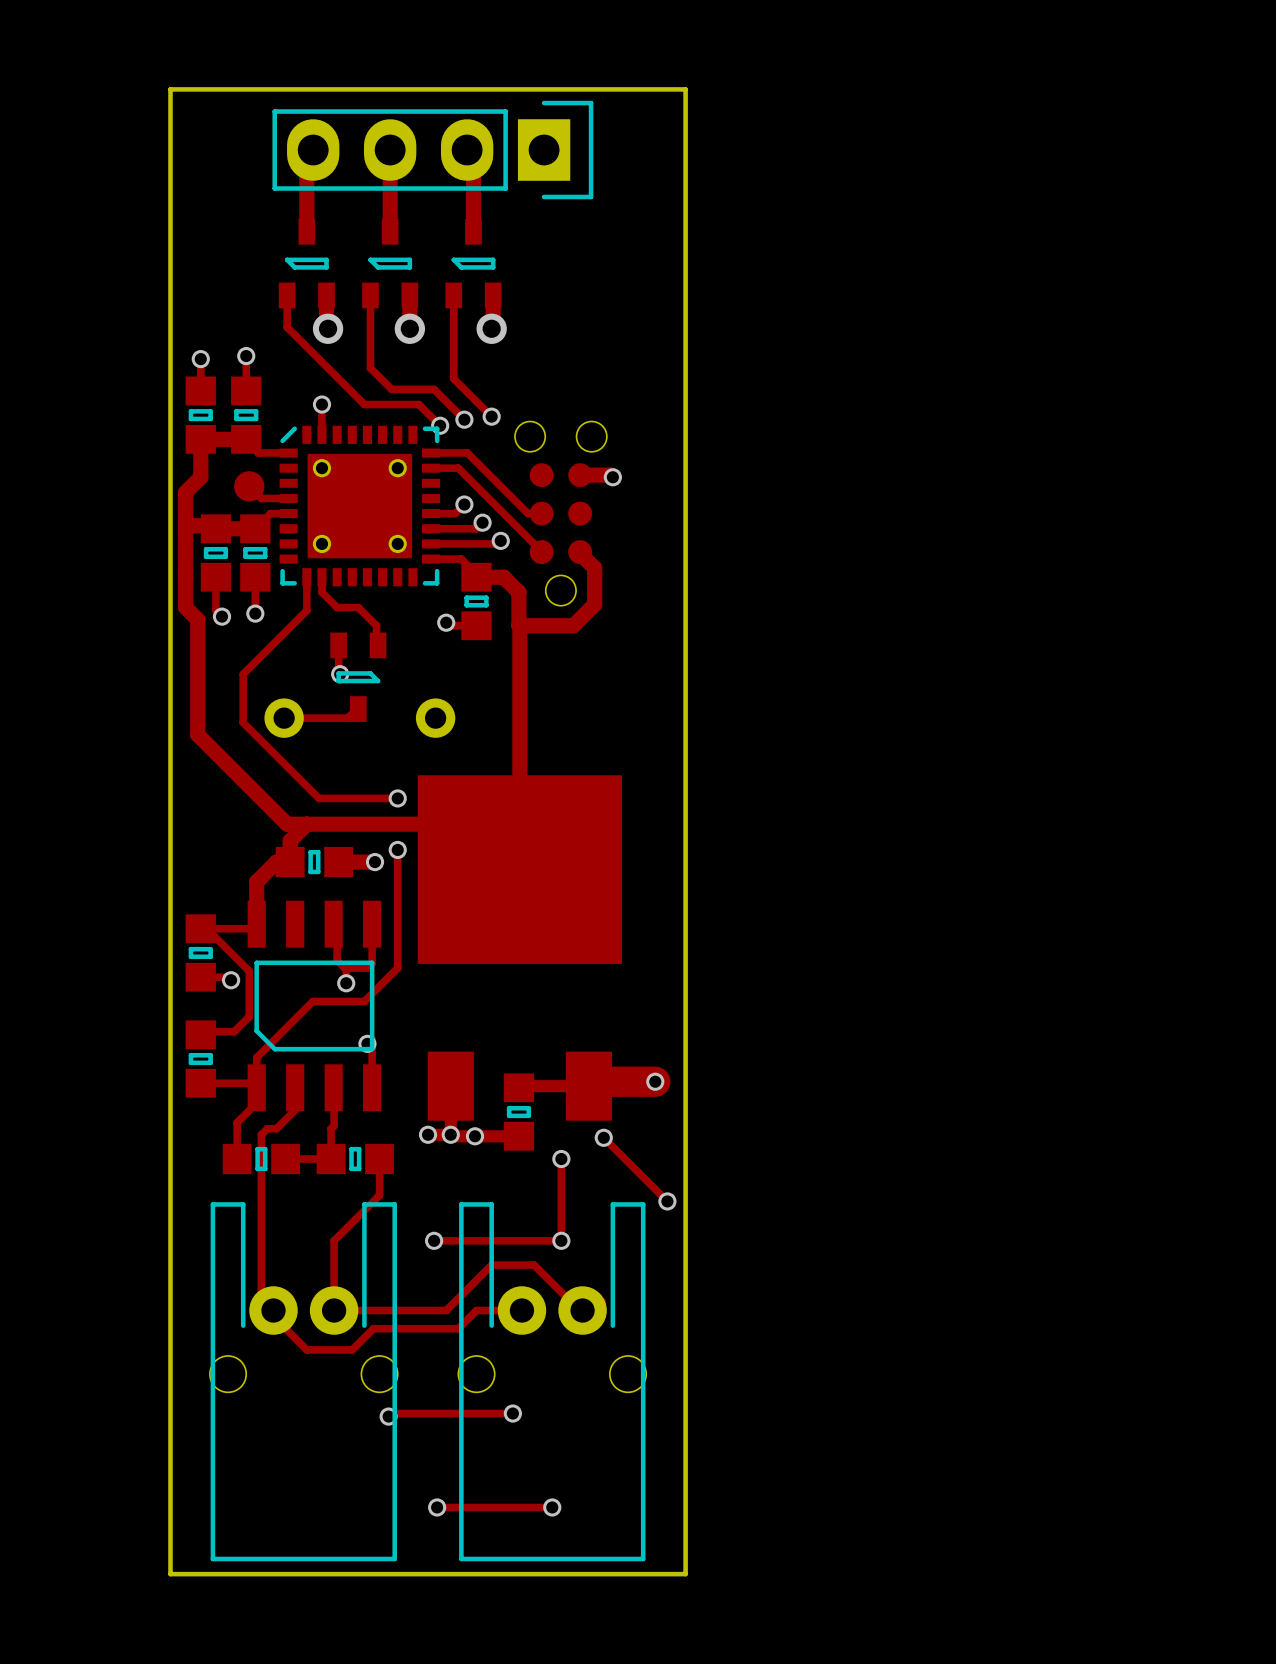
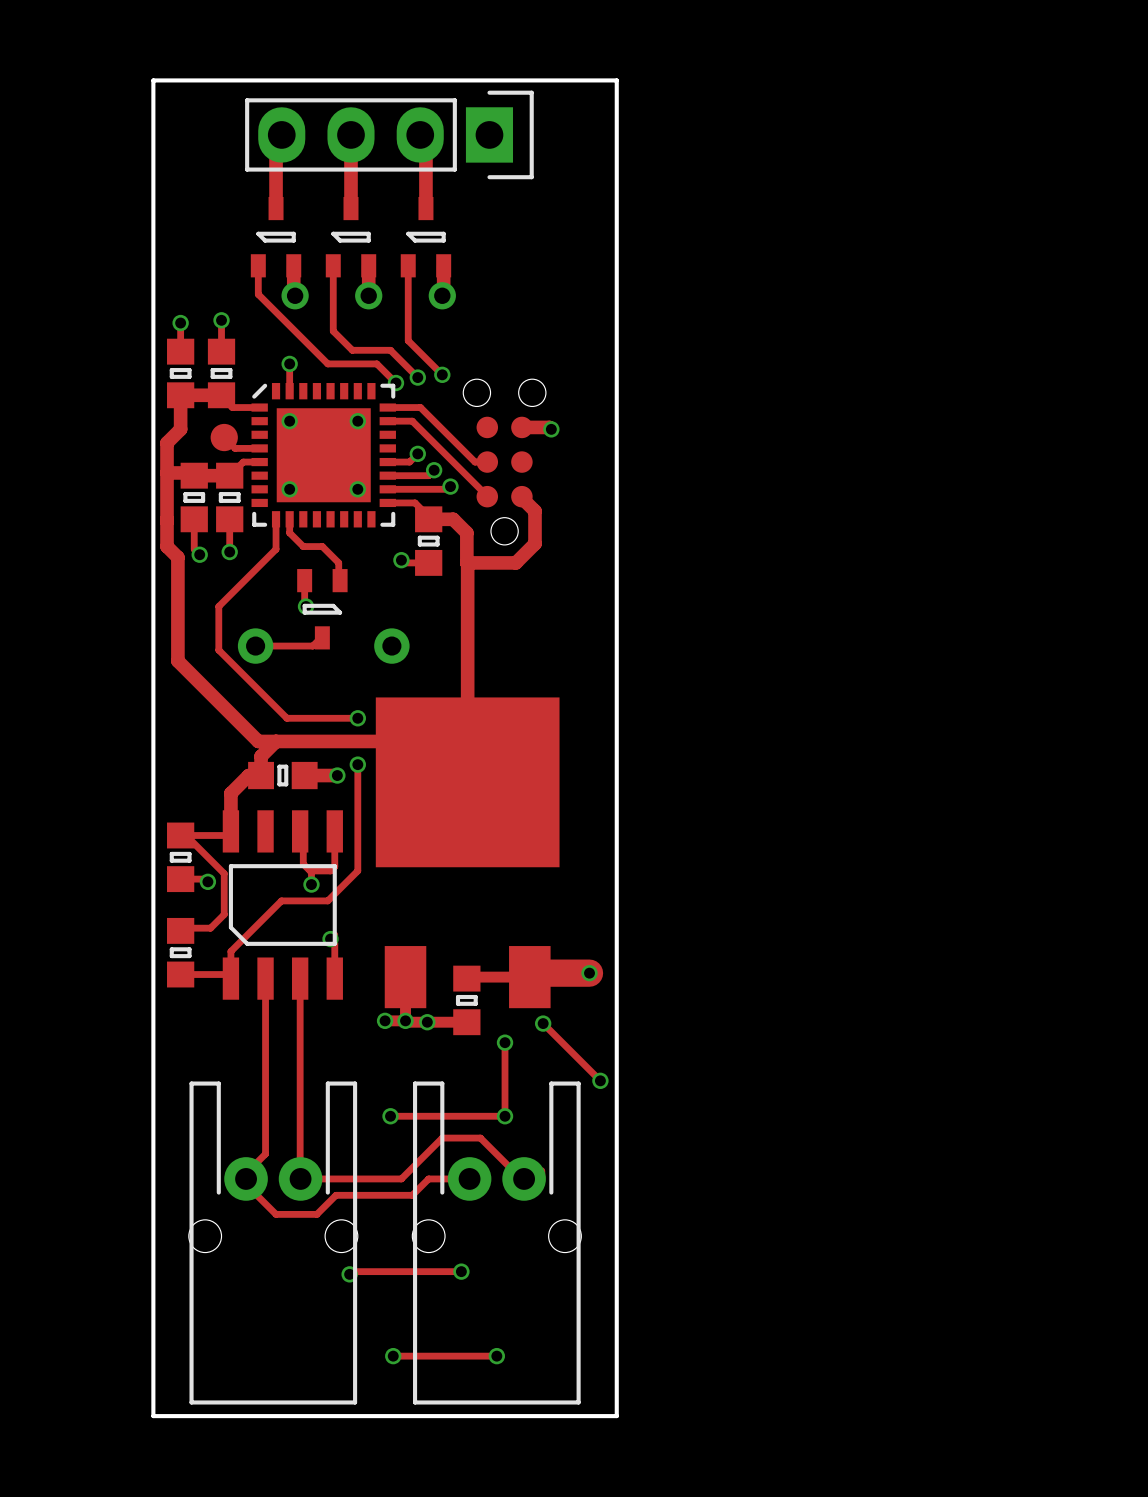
track: (256, 1087) (258, 1101) (237, 1122) (237, 1159) -> none
track: (333, 1087) (334, 1086) (334, 1125) (331, 1128) (331, 1159) (285, 1159) -> (300, 978) (300, 1182)
track: (295, 1110) (276, 1128) (267, 1128) (261, 1134) (261, 1292) (273, 1304) -> (265, 998) (265, 1154) (246, 1173)
part: (261, 1159) -> none
part: (355, 1159) -> none
track: (379, 1159) (379, 1195) (334, 1240) (334, 1310) -> none

